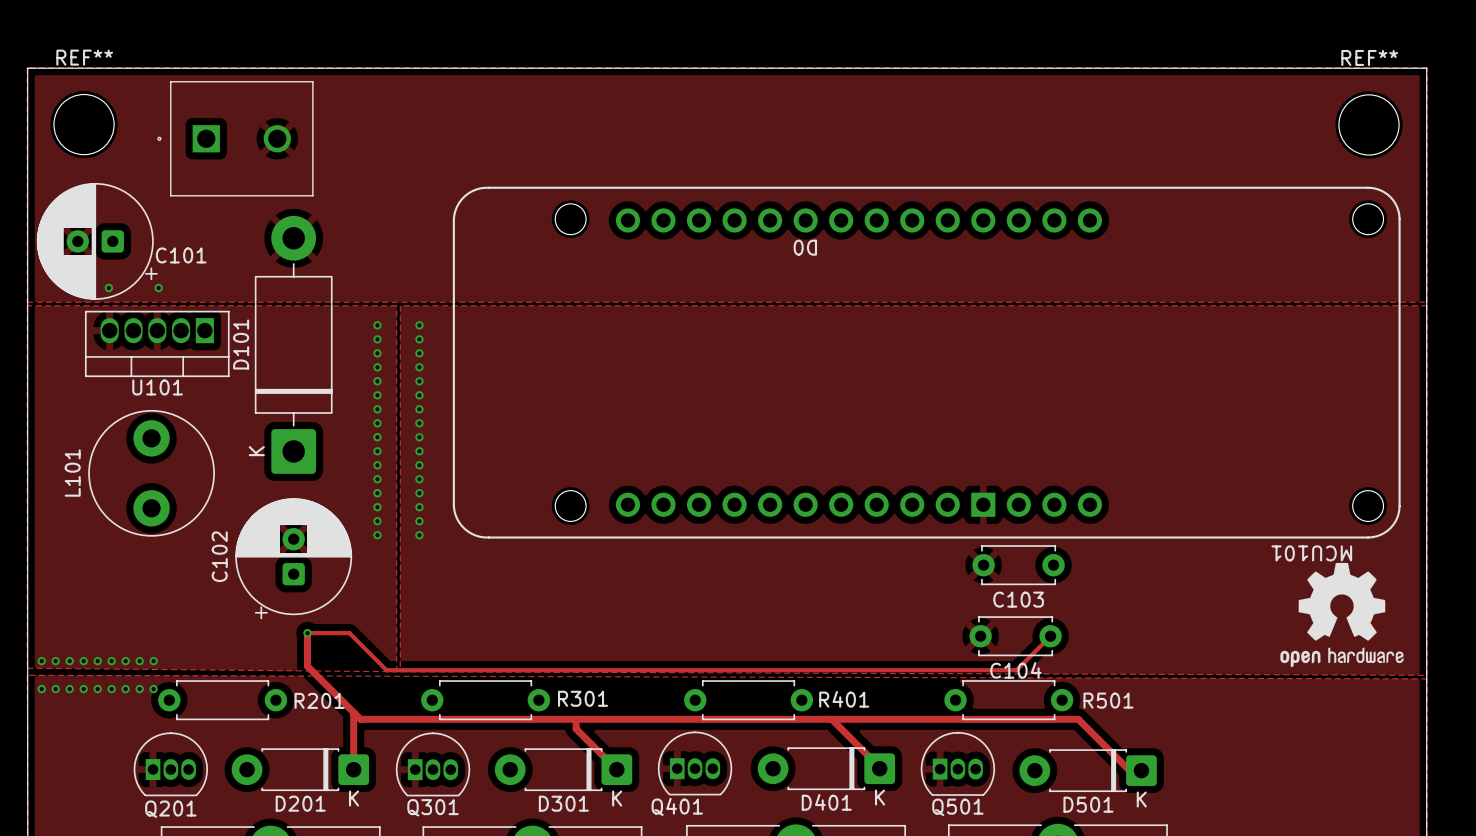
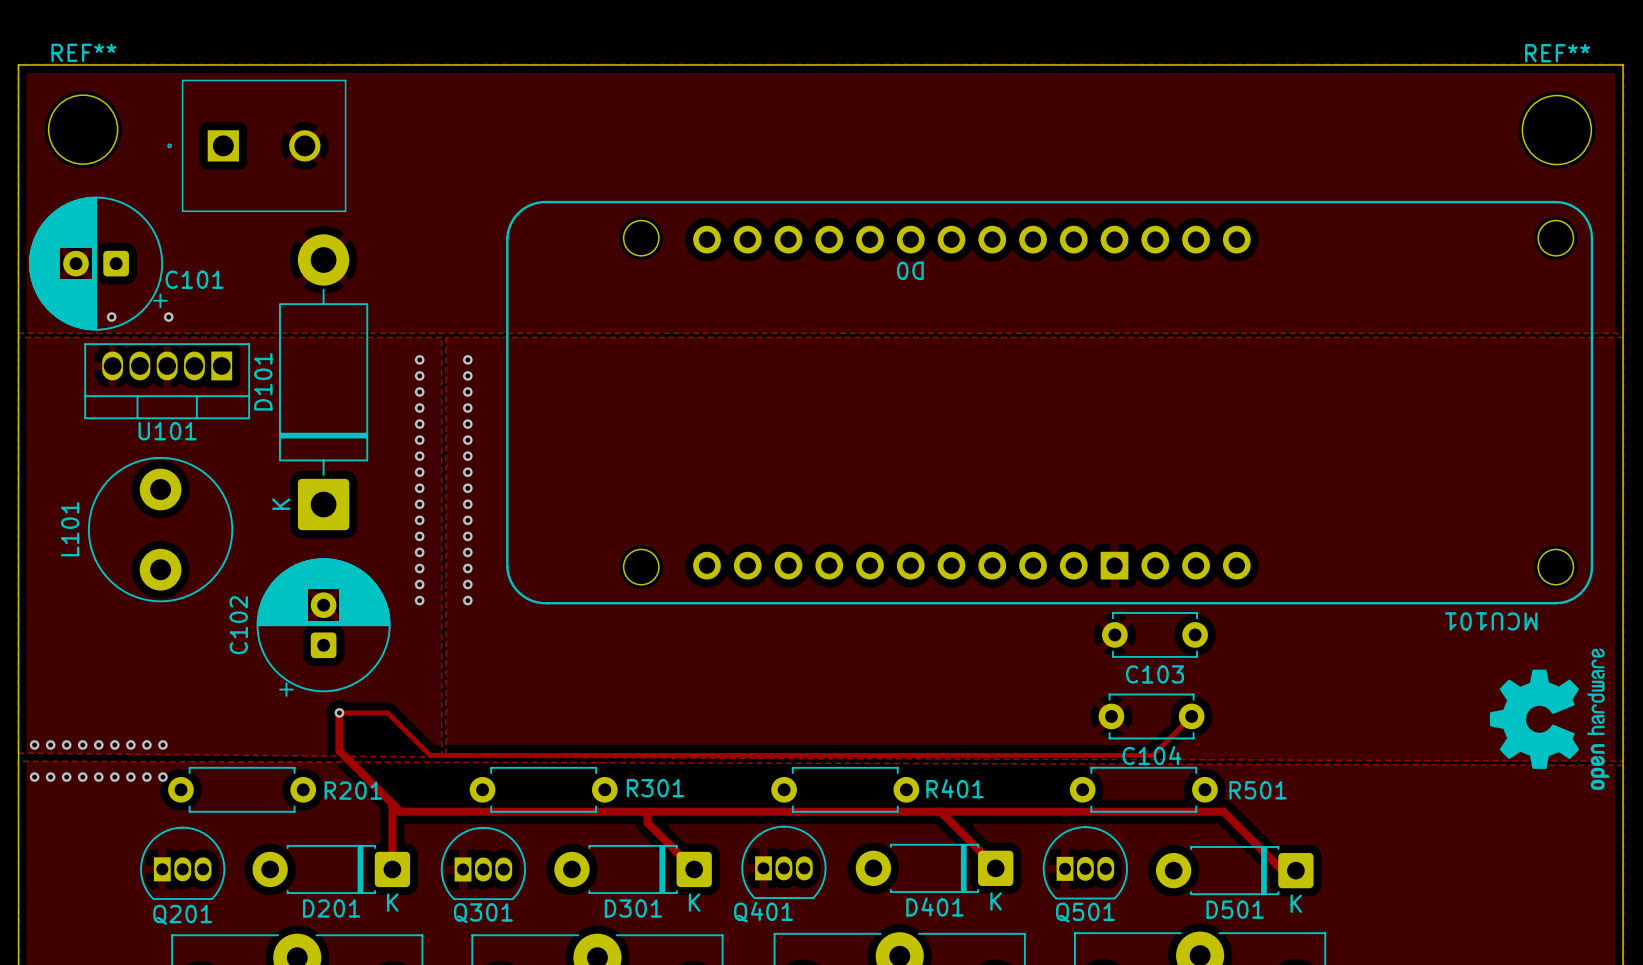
drawing: [1280, 562, 1404, 668] -> none
drawing: none -> [1489, 648, 1610, 790]

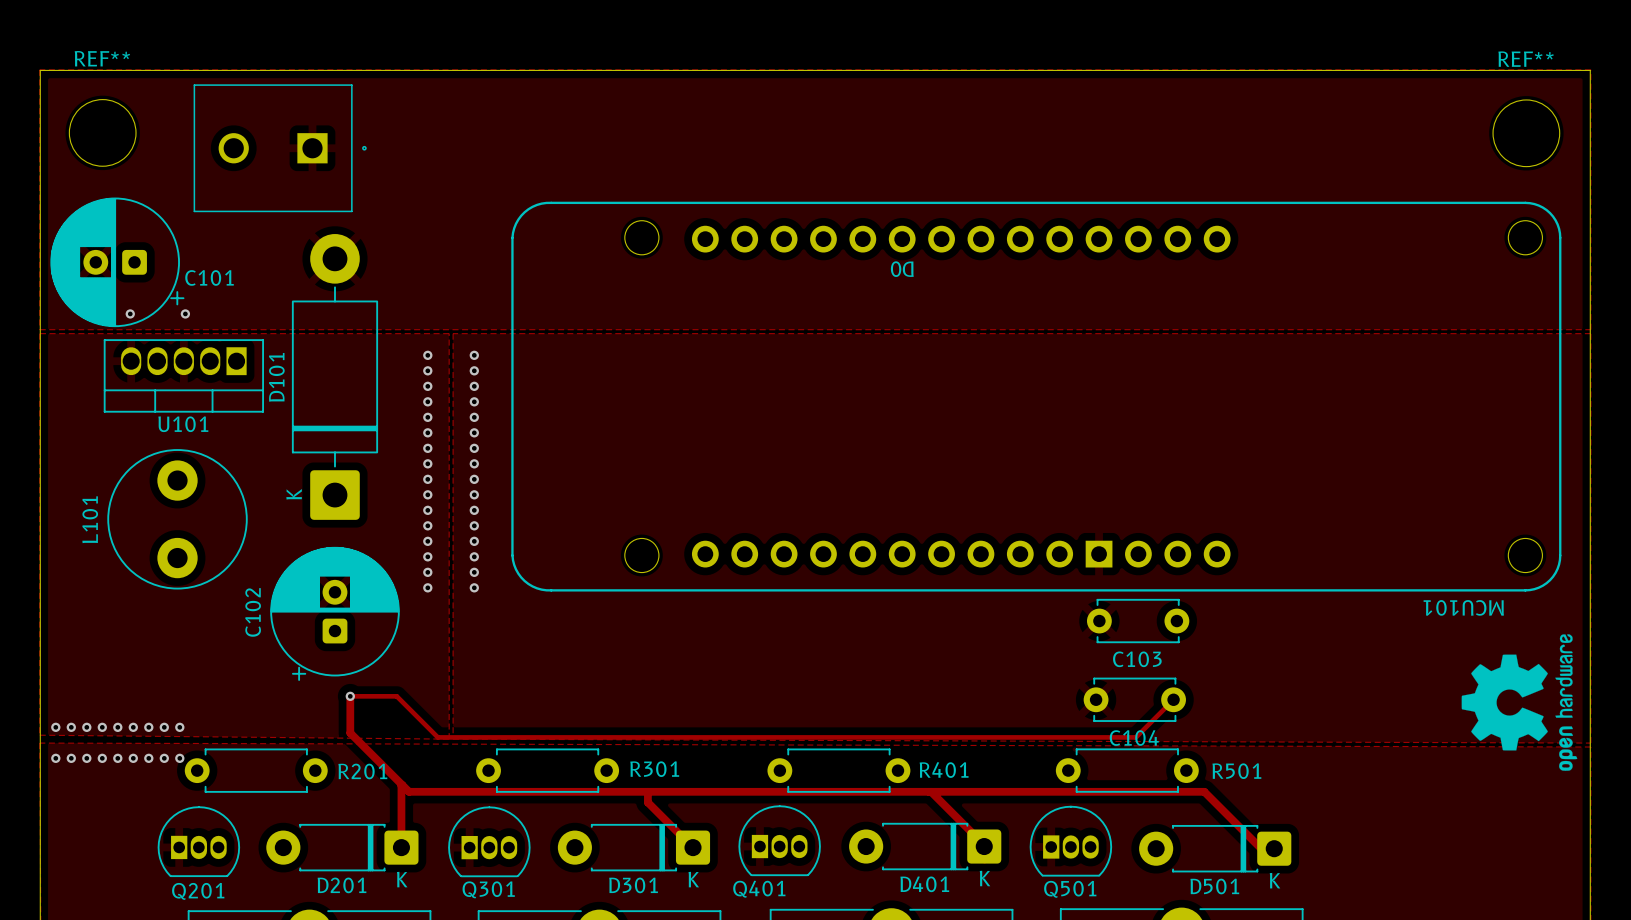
part rotation: 0° (256, 145) -> 180° (280, 148)

